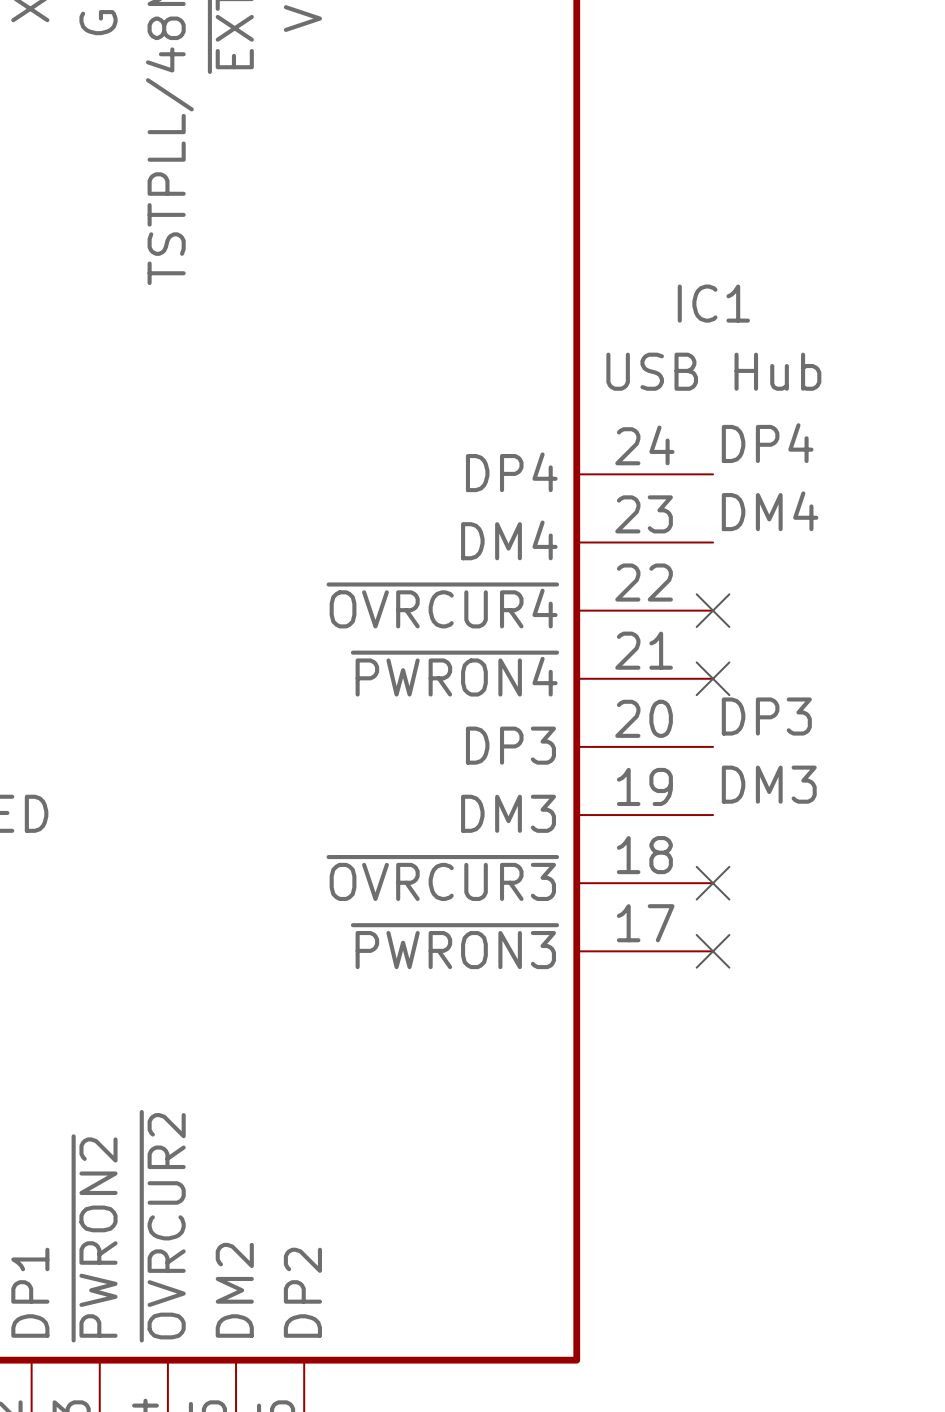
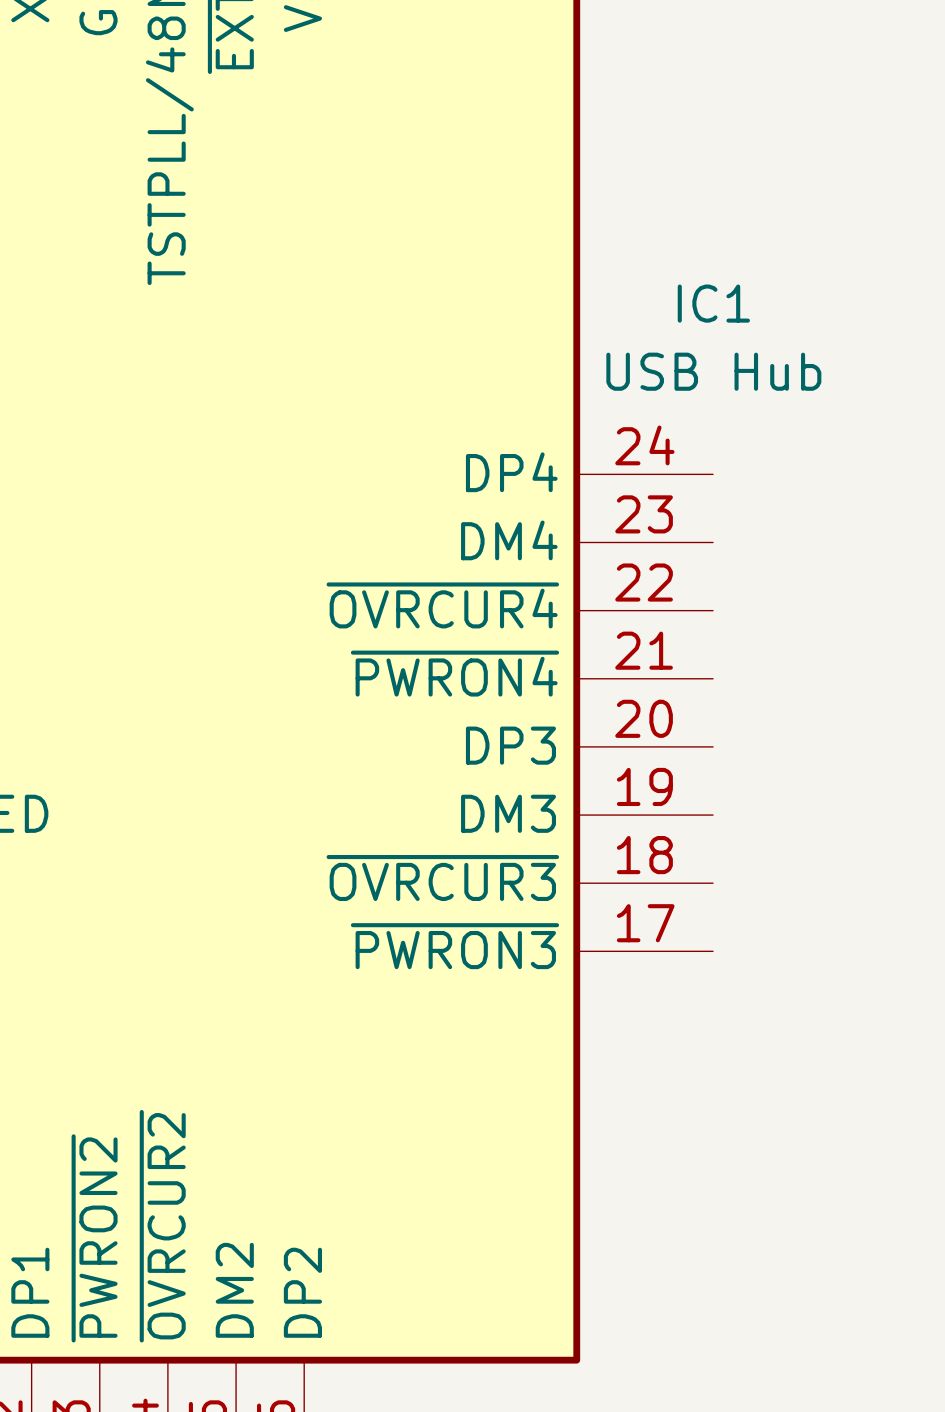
label: DP4 (767, 443) -> none
label: DM4 (770, 511) -> none
no-connect mark: (713, 610) -> none
no-connect mark: (713, 678) -> none
label: DP3 (766, 716) -> none
label: DM3 (769, 784) -> none
no-connect mark: (713, 883) -> none
no-connect mark: (713, 951) -> none

